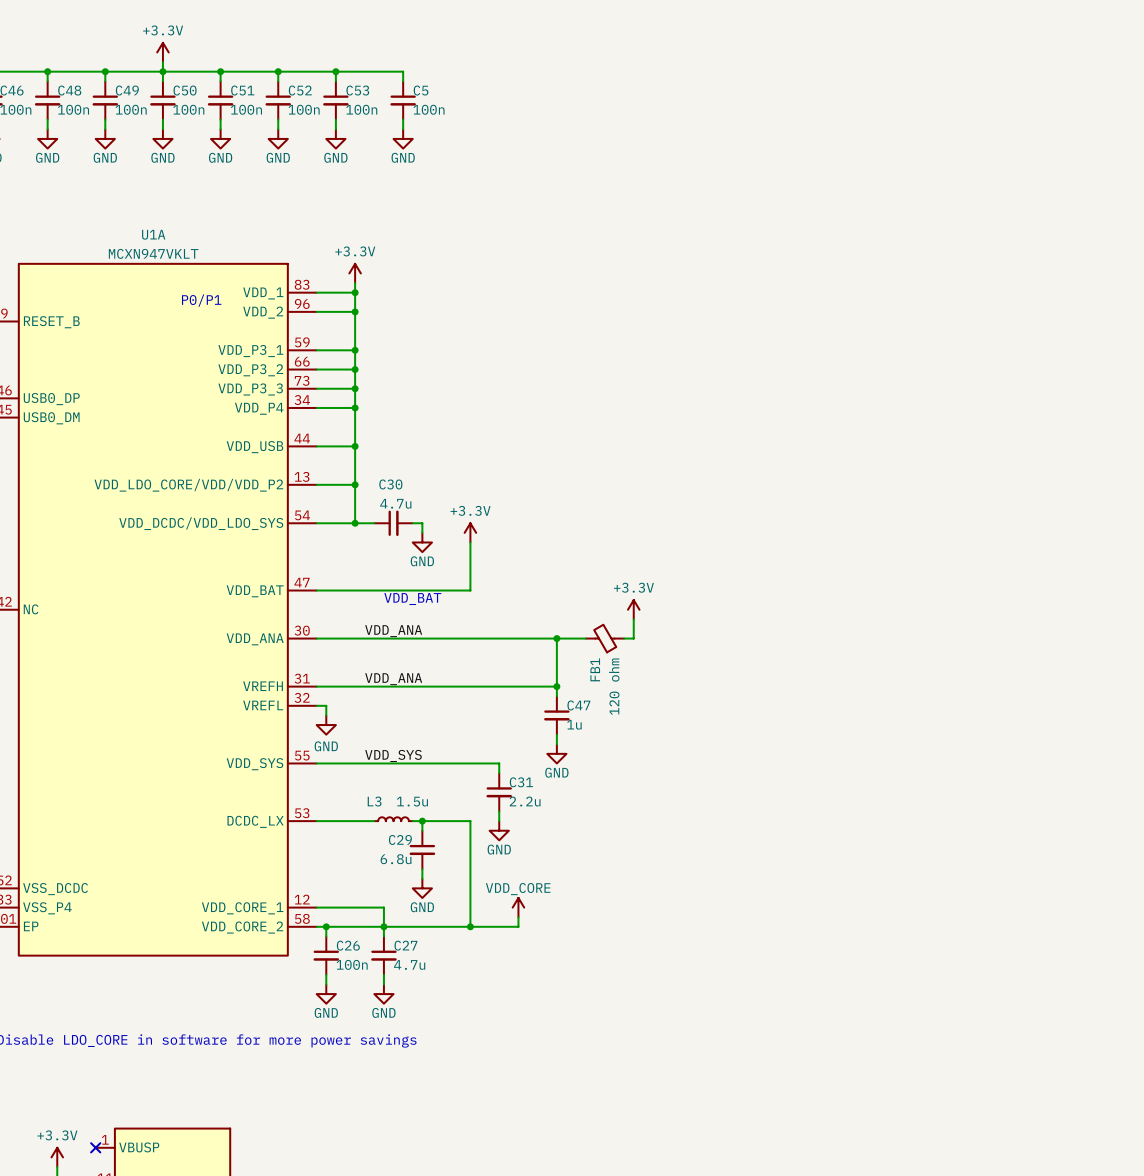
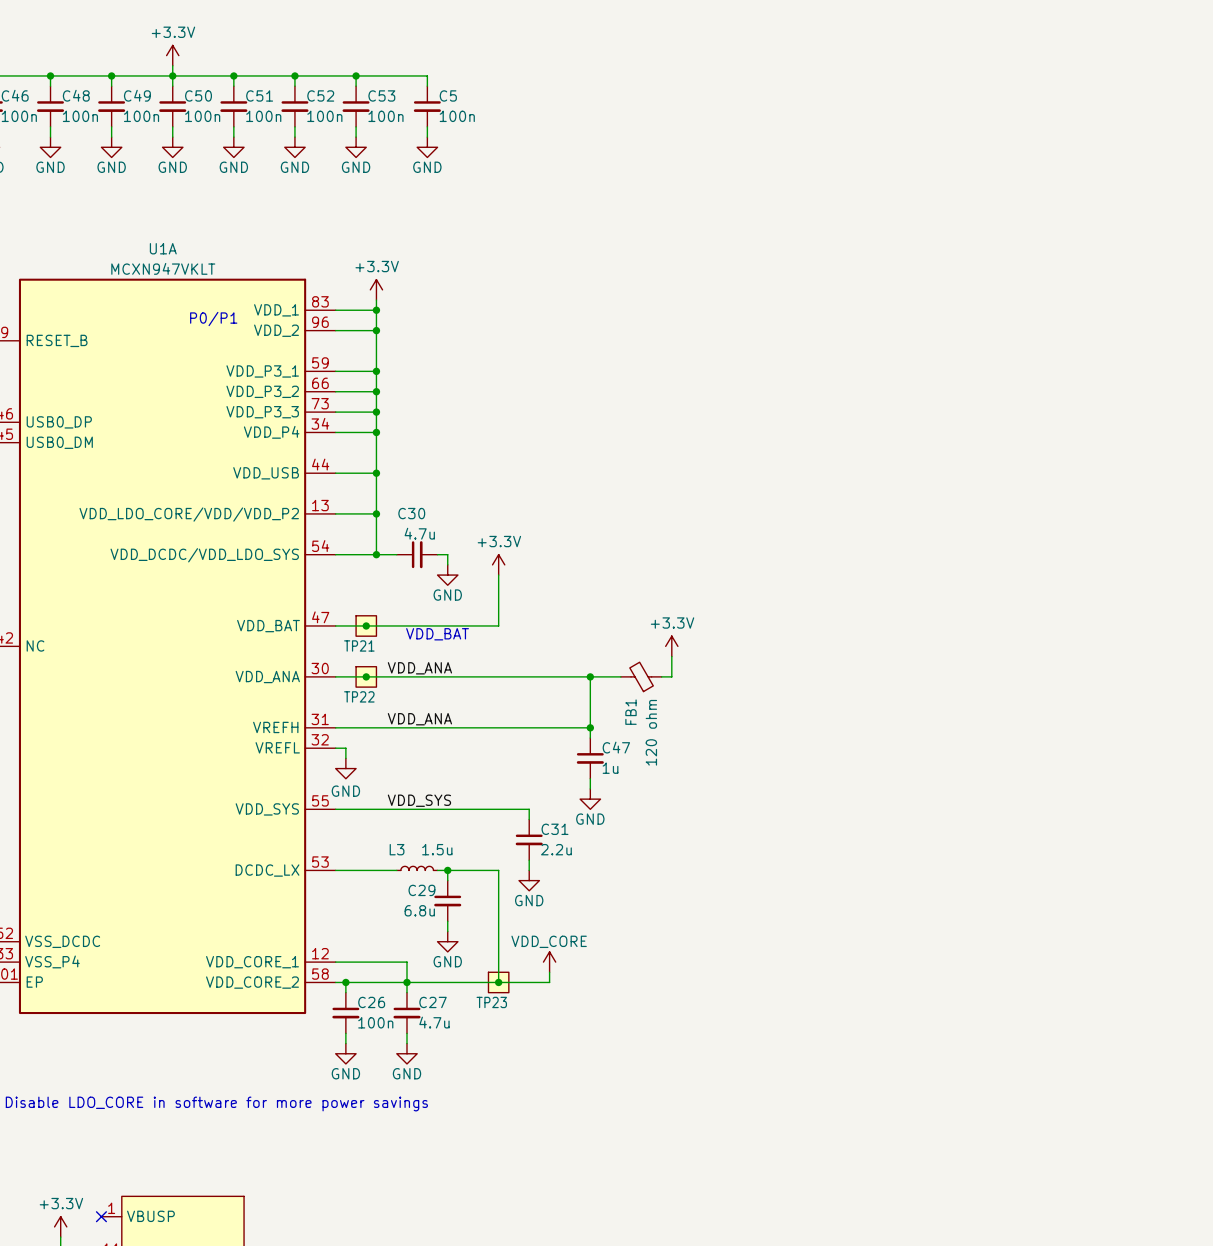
junction: none -> (366, 625)
TP21: none -> (366, 625)
junction: none -> (366, 676)
TP22: none -> (366, 676)
TP23: none -> (498, 982)

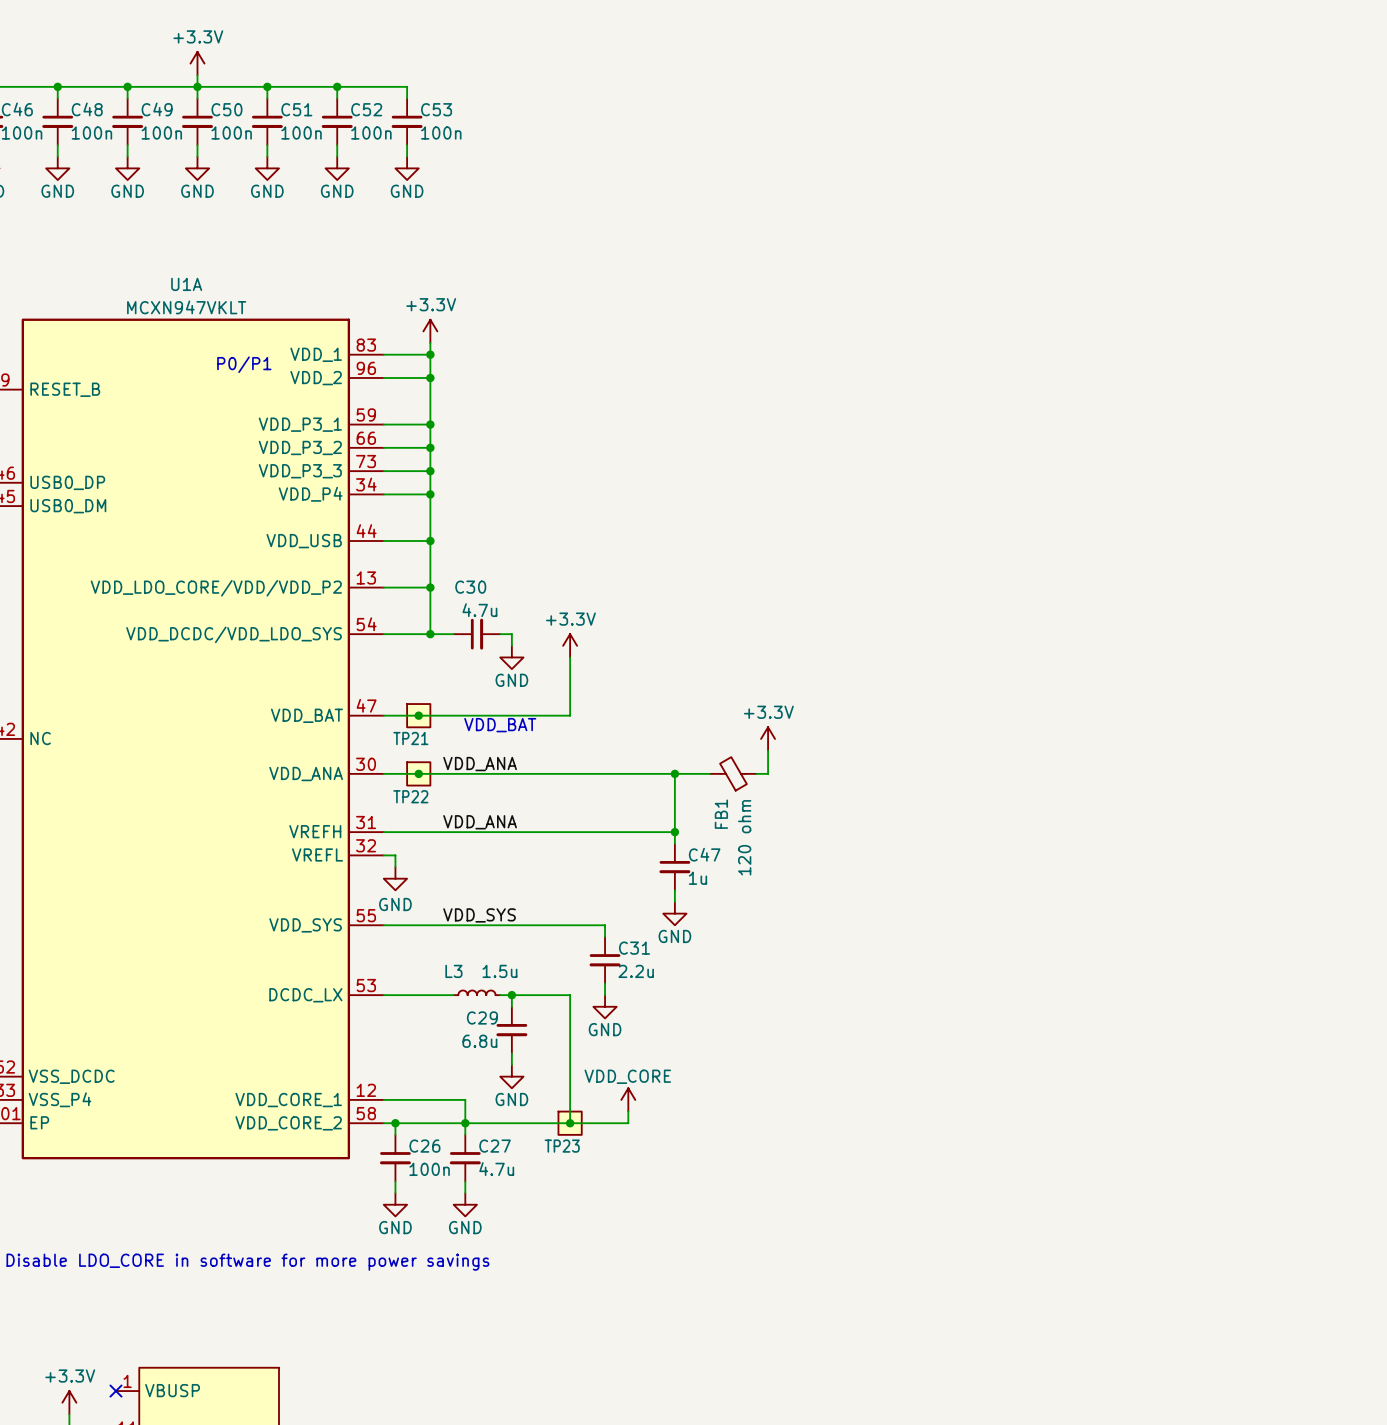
wire: (356, 75) (427, 75) (427, 86) -> none
junction: (356, 75) -> none
C5: 100n (427, 106) -> none
wire: (427, 126) (427, 137) -> none
power symbol: GND (427, 147) -> none

